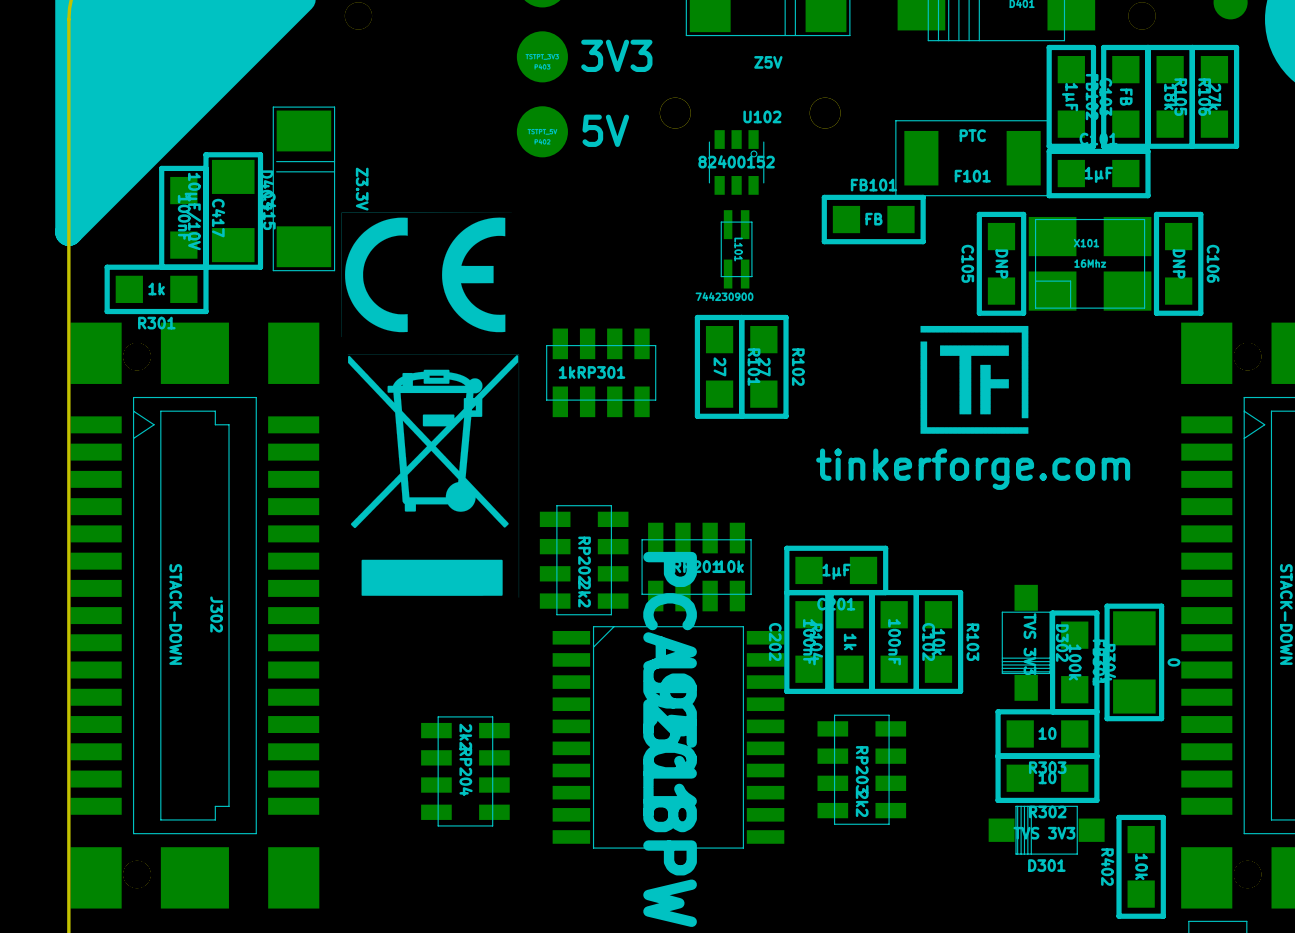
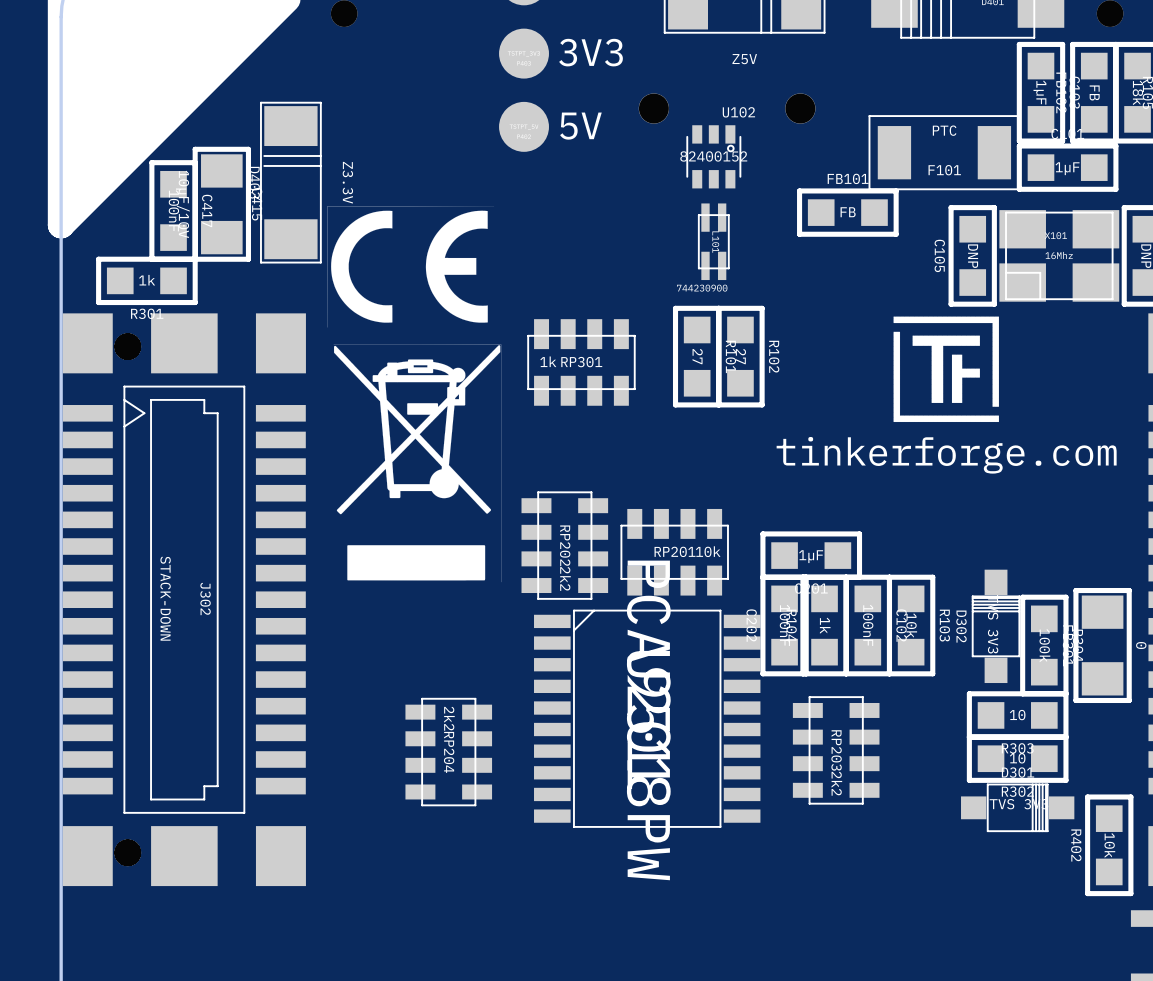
D302 rotation: 0° (1026, 642) -> 180° (996, 626)
D301 rotation: 0° (1046, 830) -> 180° (1017, 807)

